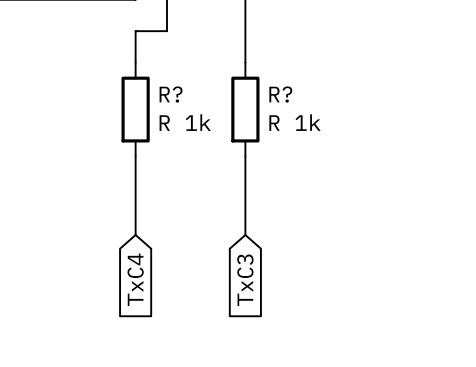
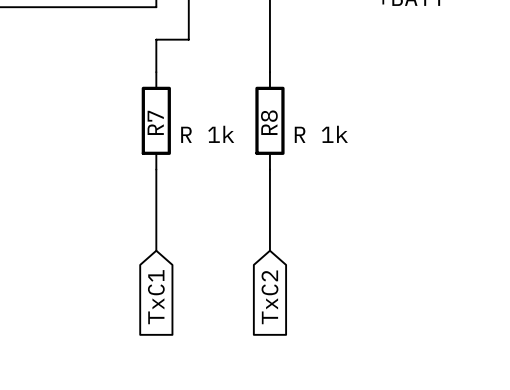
R? name: R? (171, 94) -> R7 (155, 122)
R? name: R? (280, 94) -> R8 (269, 122)
global label: TxC4 (135, 279) -> TxC1 (156, 297)
global label: TxC3 (245, 280) -> TxC2 (269, 297)

